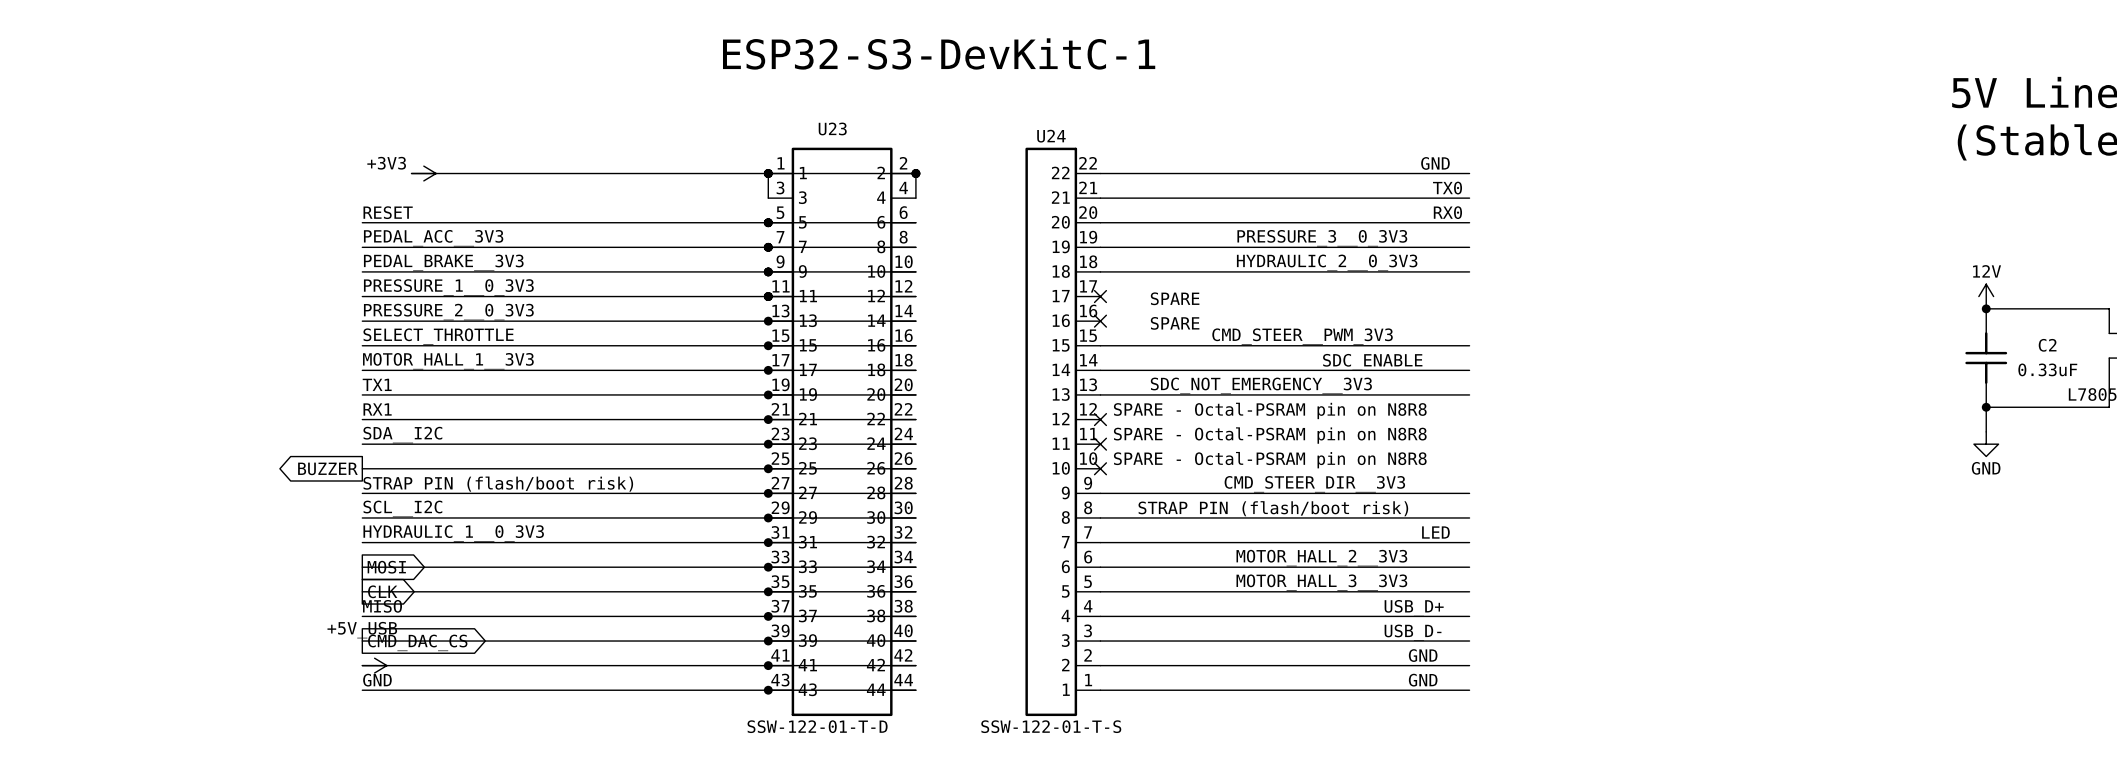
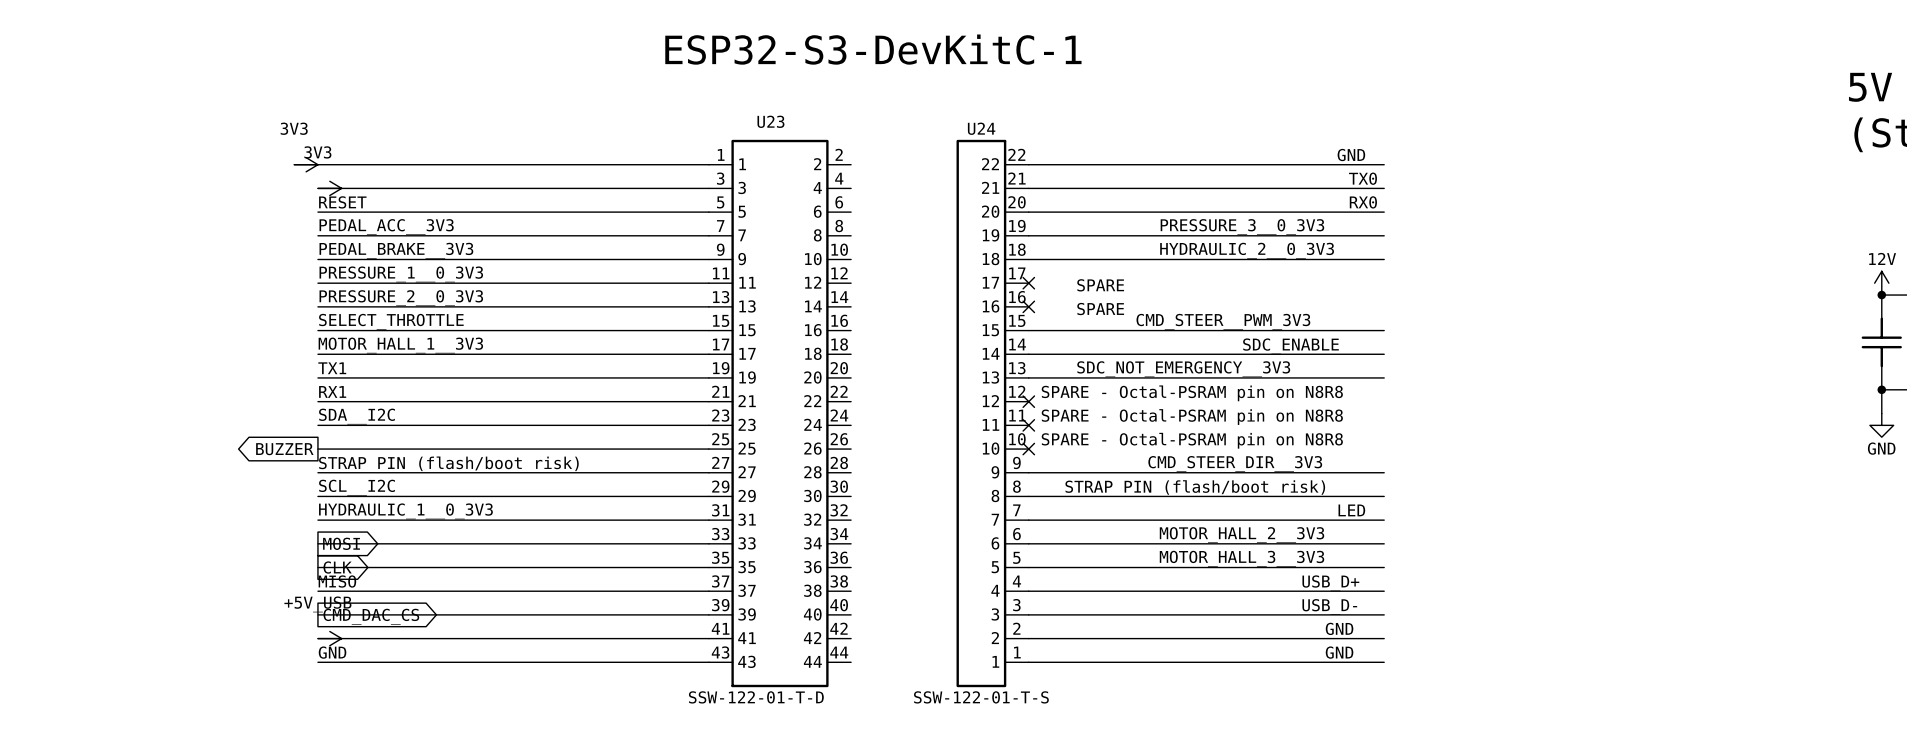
wire: none -> (294, 164) (365, 164)
power symbol: none -> 3V3 (306, 164)
power symbol: +3V3 (423, 173) -> none
junction: (768, 173) -> none
junction: (915, 173) -> none
power symbol: none -> 3V3 (329, 188)
wire: (768, 198) (768, 173) (915, 173) (915, 198) -> (708, 188) (317, 188)
wire: (768, 222) (915, 222) -> none
junction: (768, 222) -> none
wire: (768, 247) (915, 247) -> none
junction: (768, 247) -> none
wire: (768, 271) (915, 271) -> none
junction: (768, 271) -> none
wire: (768, 296) (915, 296) -> none
junction: (768, 296) -> none
wire: (768, 321) (915, 321) -> none
junction: (768, 321) -> none
wire: (768, 345) (915, 345) -> none
junction: (768, 345) -> none
wire: (768, 370) (915, 370) -> none
junction: (768, 370) -> none
wire: (768, 394) (915, 394) -> none
junction: (768, 394) -> none
wire: (768, 419) (915, 419) -> none
junction: (768, 419) -> none
wire: (768, 444) (915, 444) -> none
junction: (768, 444) -> none
wire: (768, 468) (915, 468) -> none
junction: (768, 468) -> none
wire: (768, 493) (915, 493) -> none
junction: (768, 493) -> none
wire: (768, 517) (915, 517) -> none
junction: (768, 517) -> none
wire: (768, 542) (915, 542) -> none
junction: (768, 542) -> none
wire: (768, 567) (915, 567) -> none
junction: (768, 567) -> none
wire: (768, 591) (915, 591) -> none
junction: (768, 591) -> none
wire: (768, 616) (915, 616) -> none
junction: (768, 616) -> none
wire: (768, 641) (915, 641) -> none
junction: (768, 641) -> none
wire: (768, 665) (915, 665) -> none
junction: (768, 665) -> none
wire: (768, 690) (915, 690) -> none
junction: (768, 690) -> none

